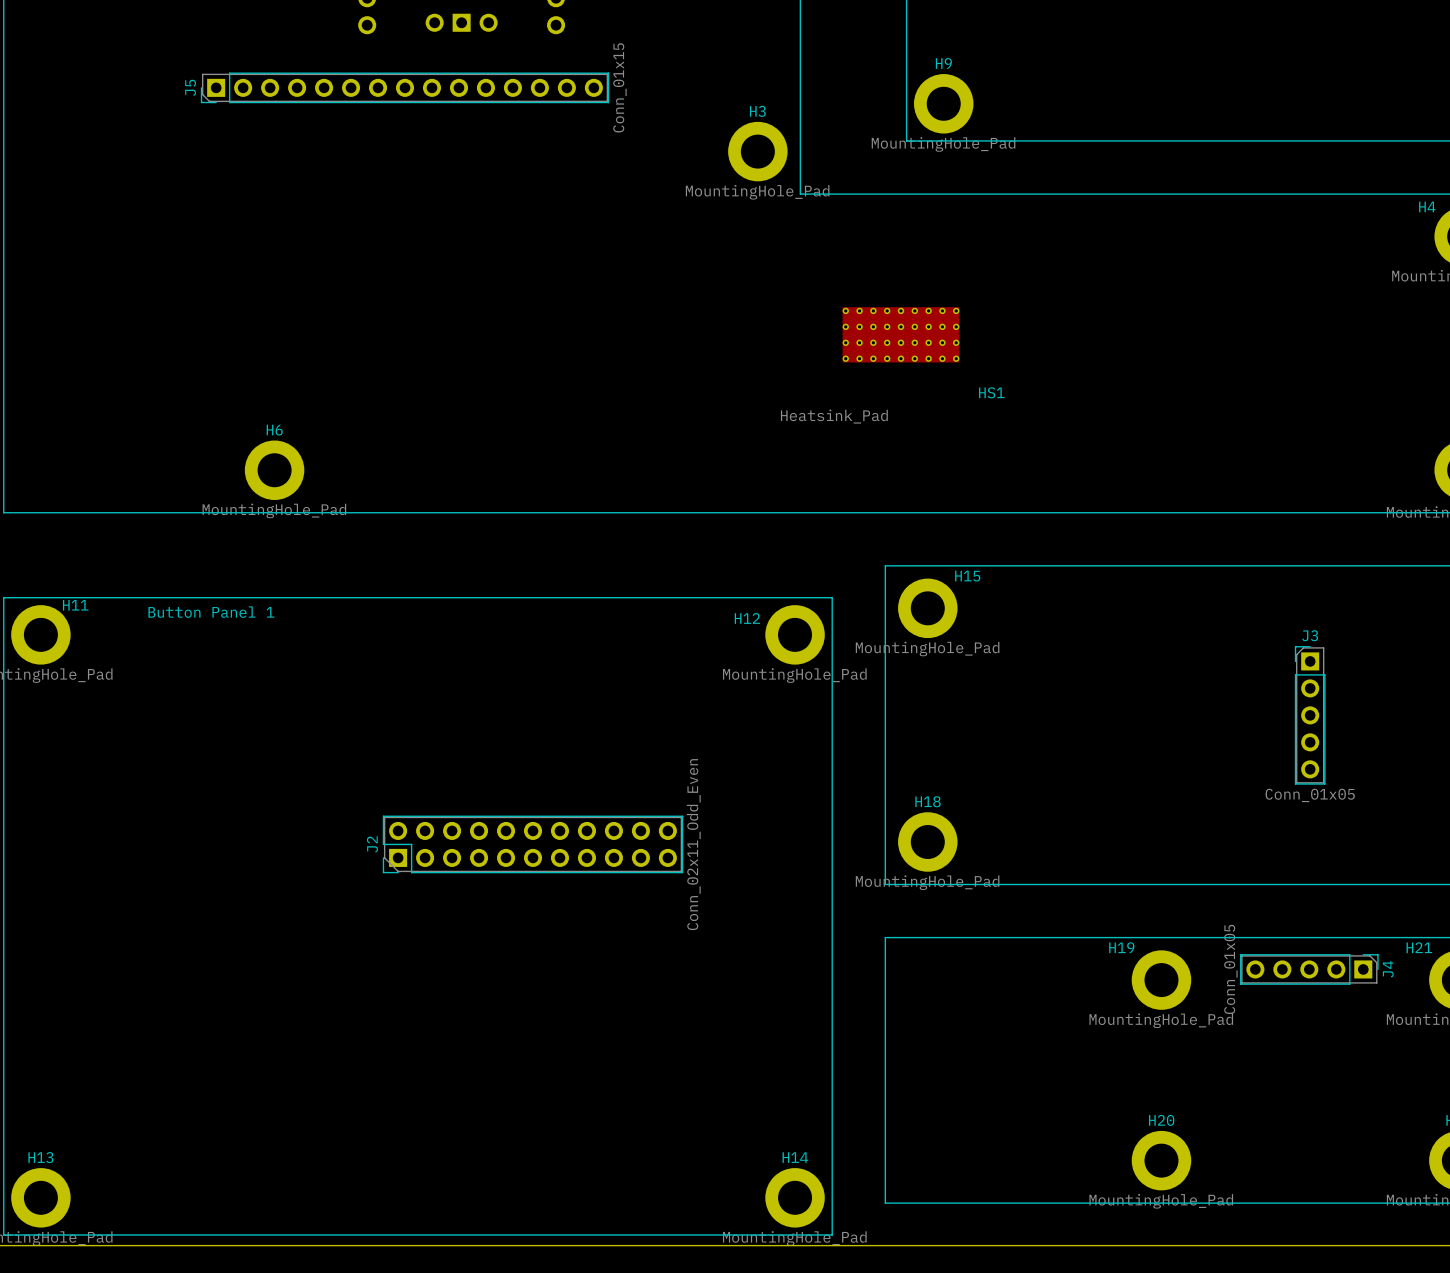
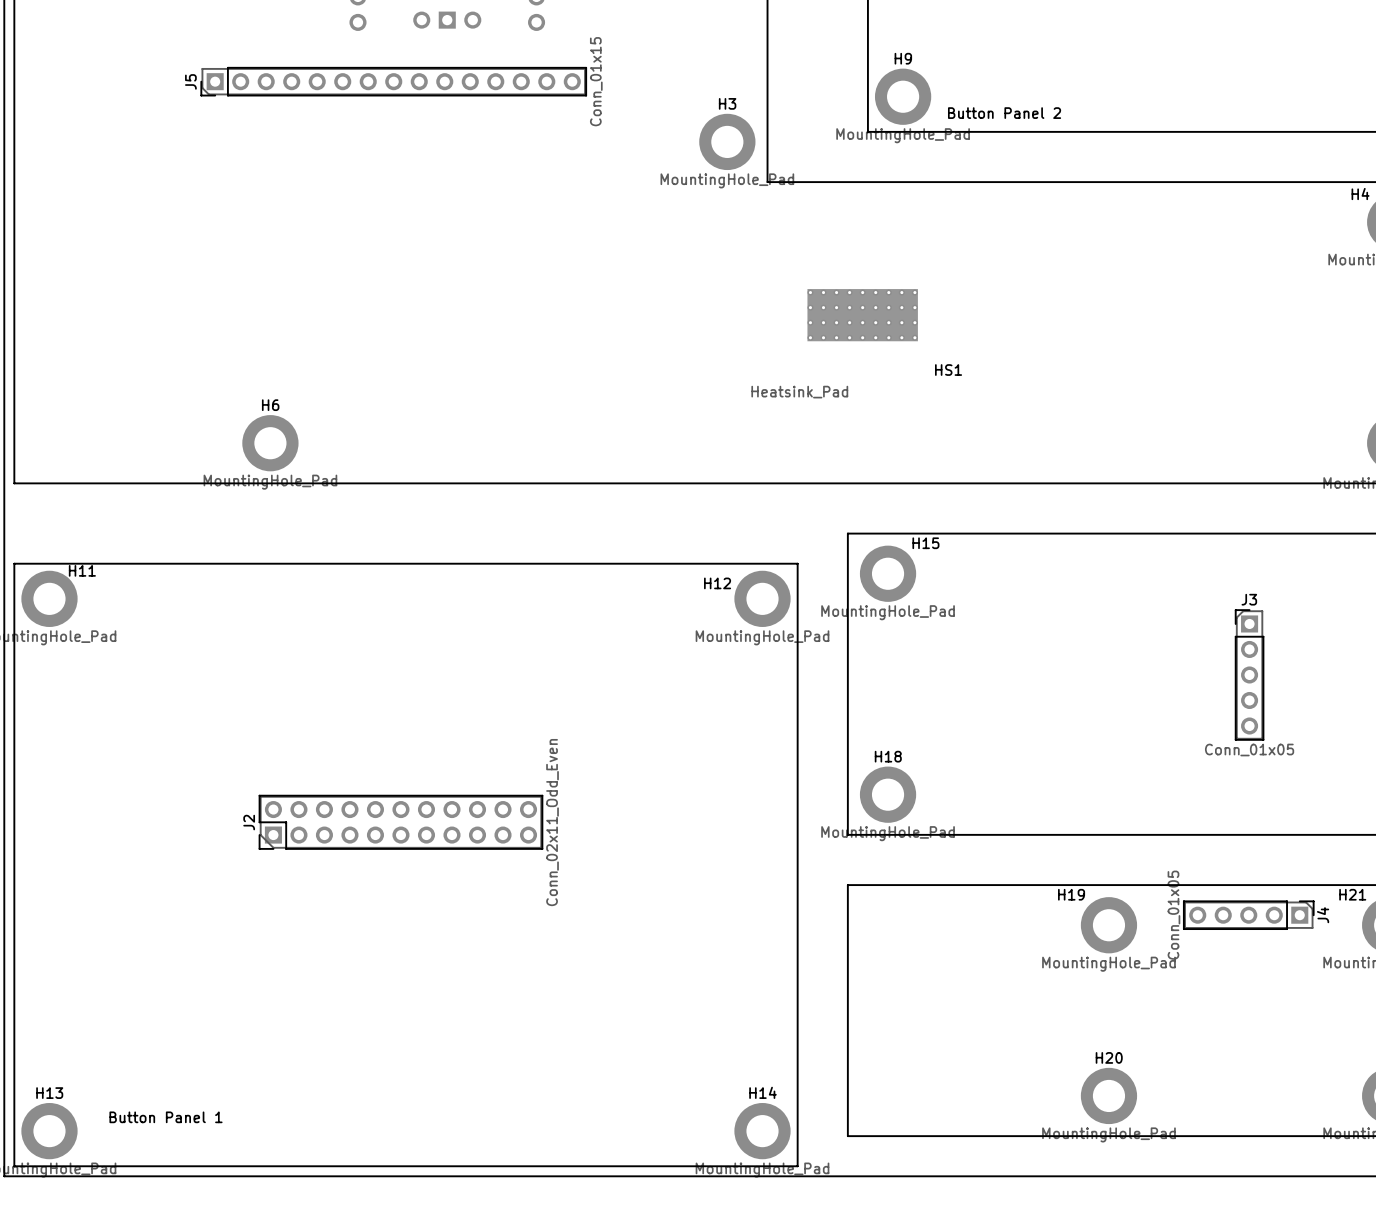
text: none -> Button Panel 2 (1004, 113)
text: Button Panel 1 (211, 612) -> none
J2 position: (533, 844) -> (400, 822)
text: none -> Button Panel 1 (165, 1117)

